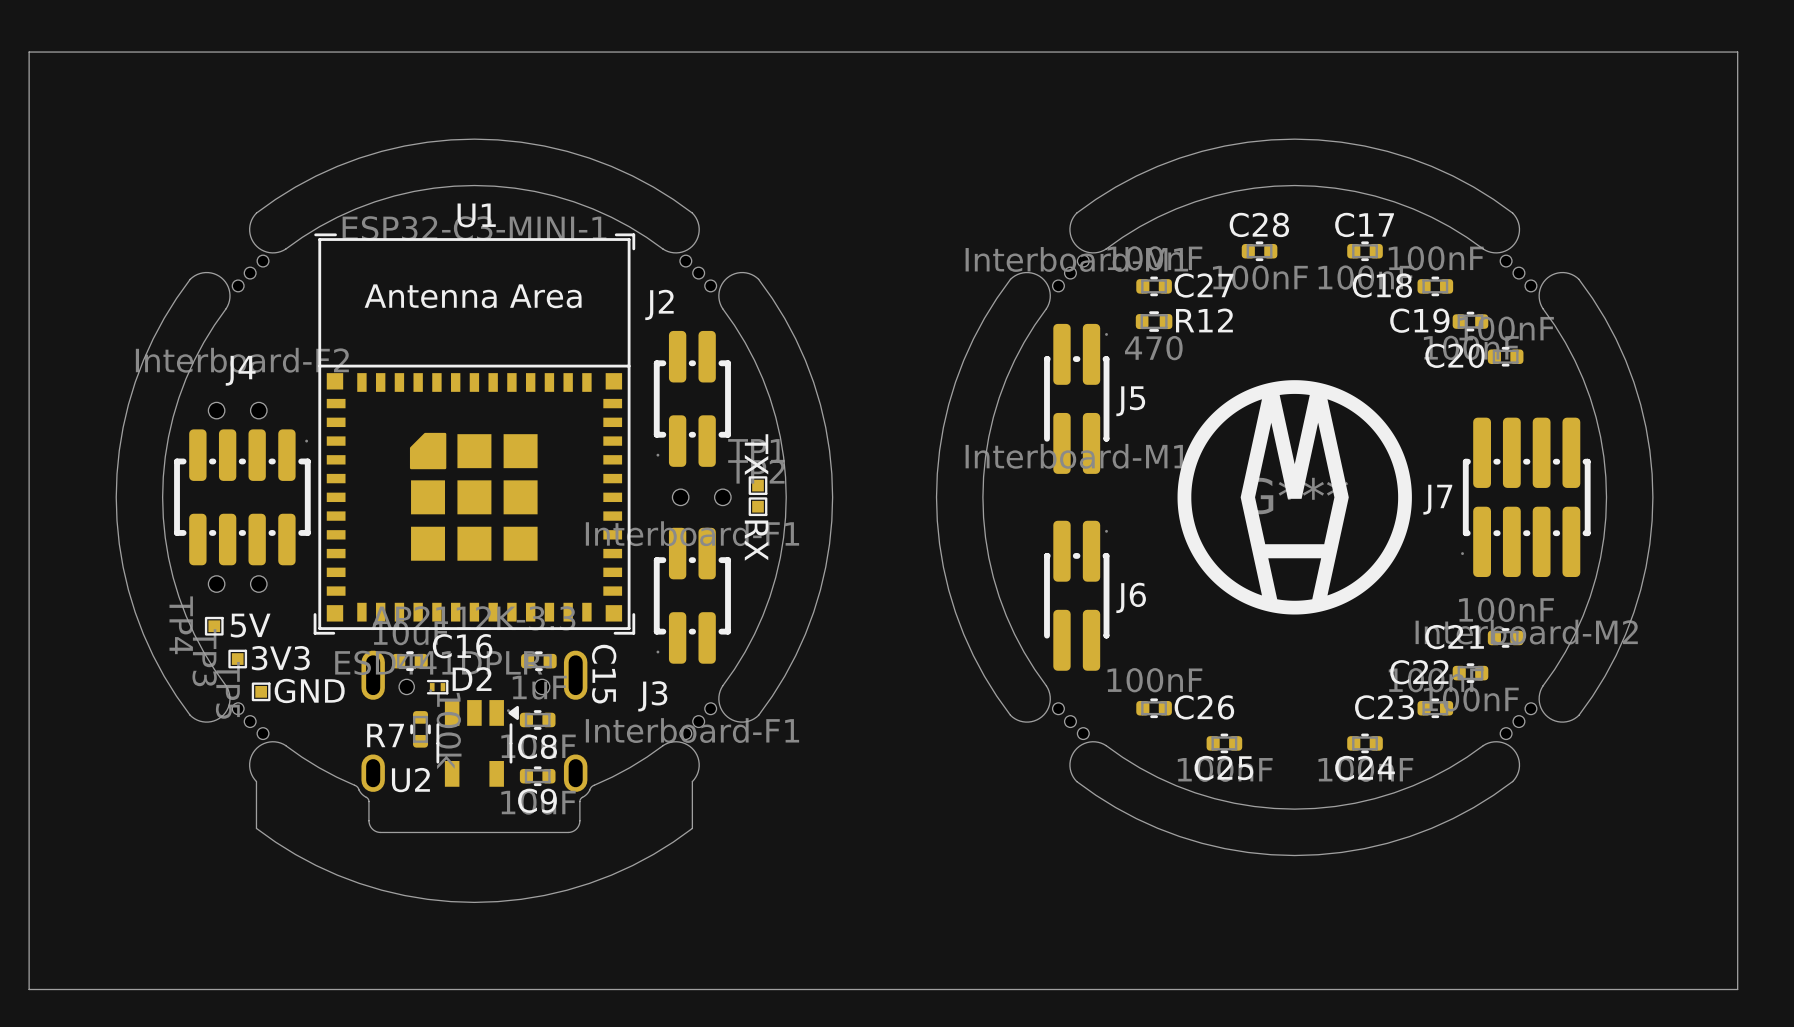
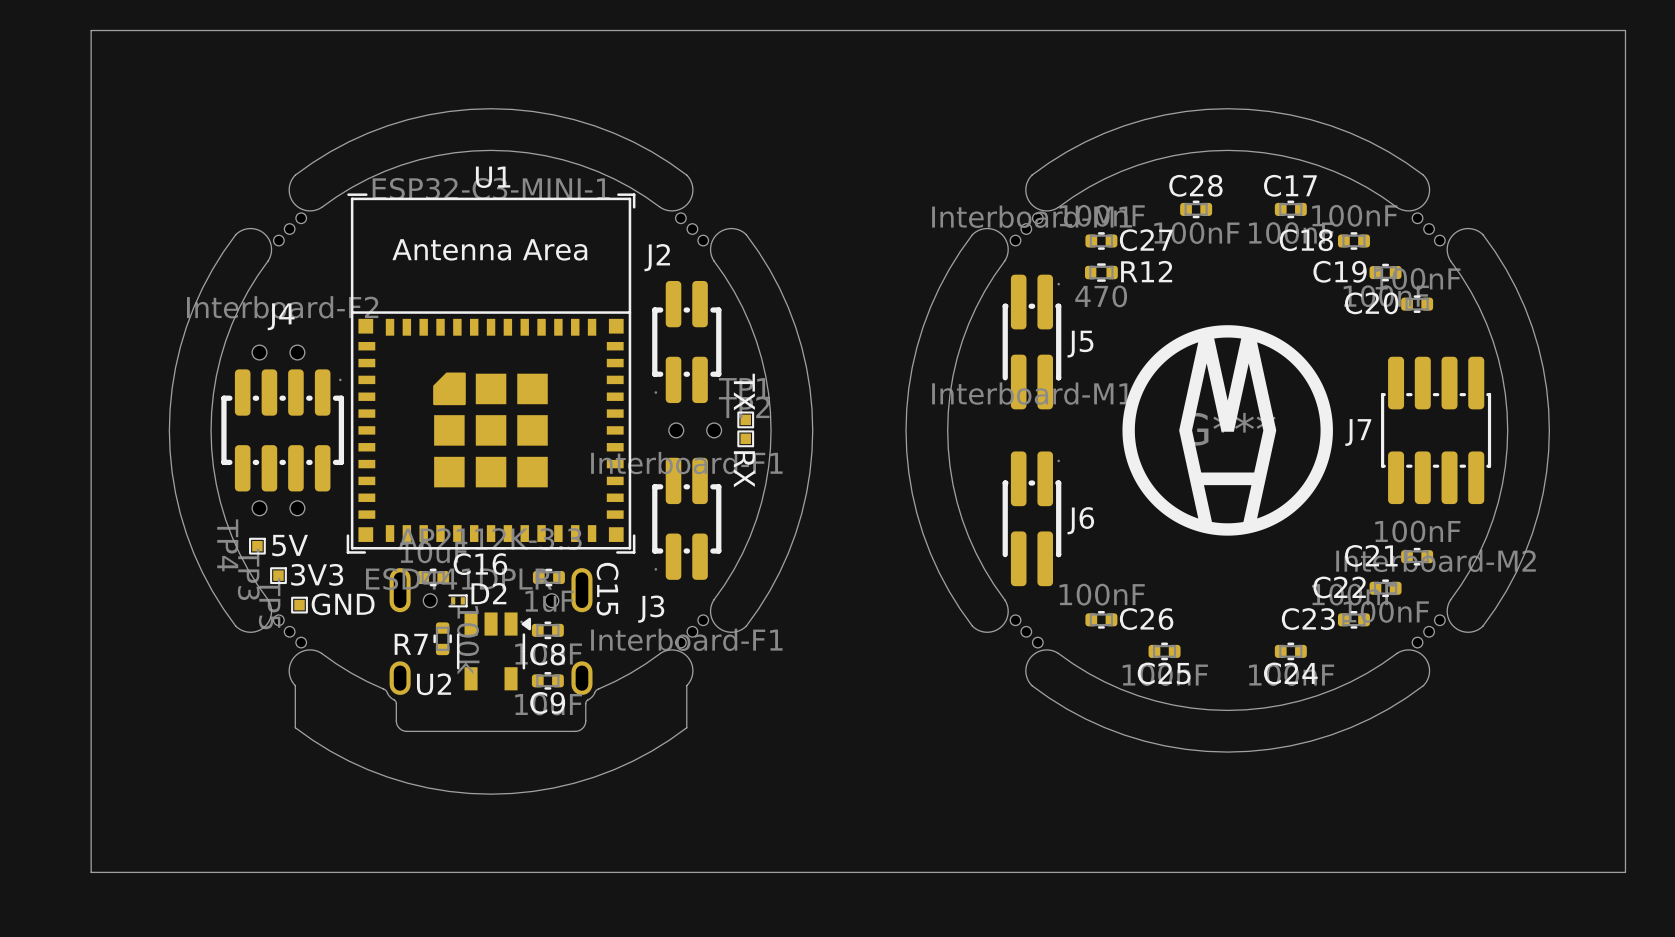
J7 footprint: [1461, 417, 1591, 578] -> [1381, 356, 1492, 505]

